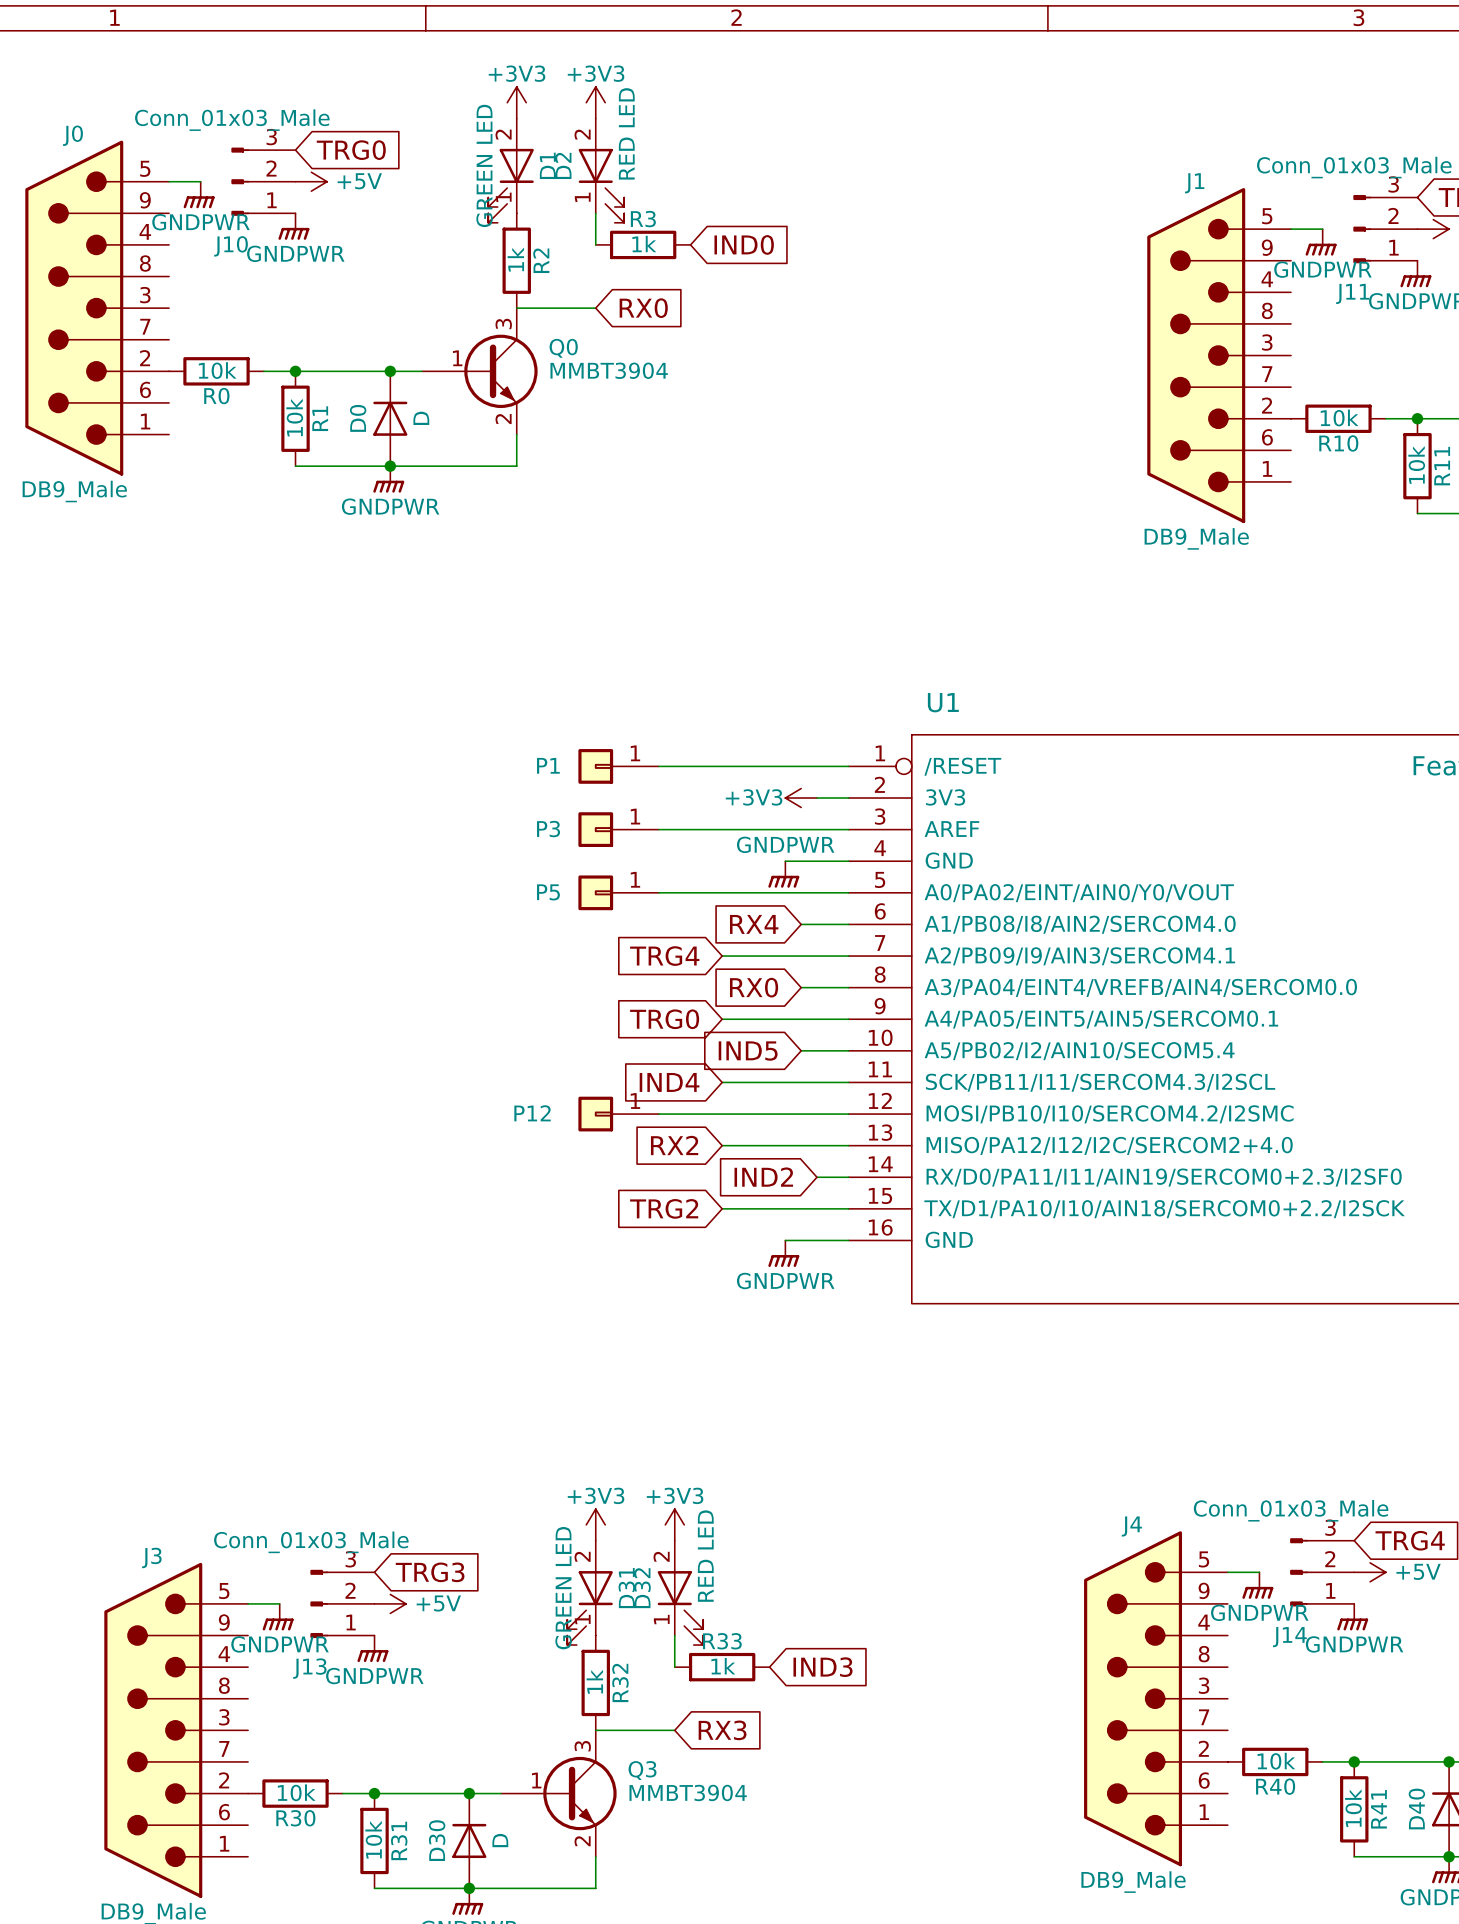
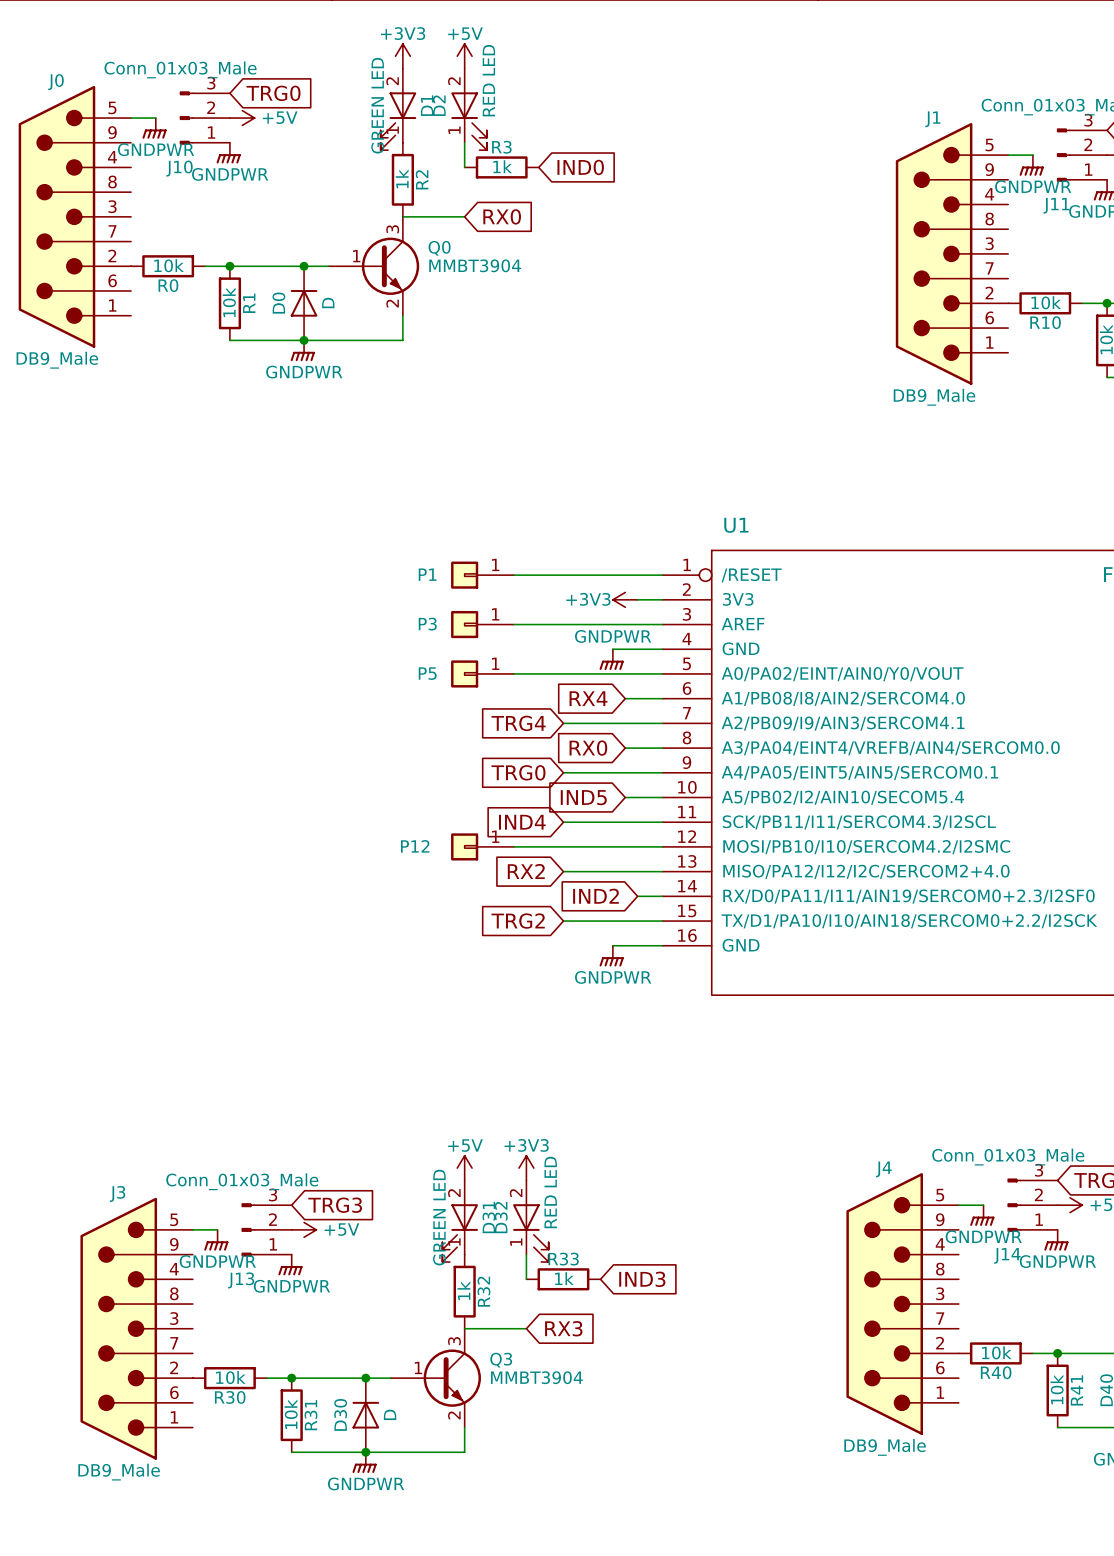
power symbol: +3V3 (595, 102) -> +5V (464, 56)
power symbol: +3V3 (595, 1524) -> +5V (464, 1168)

